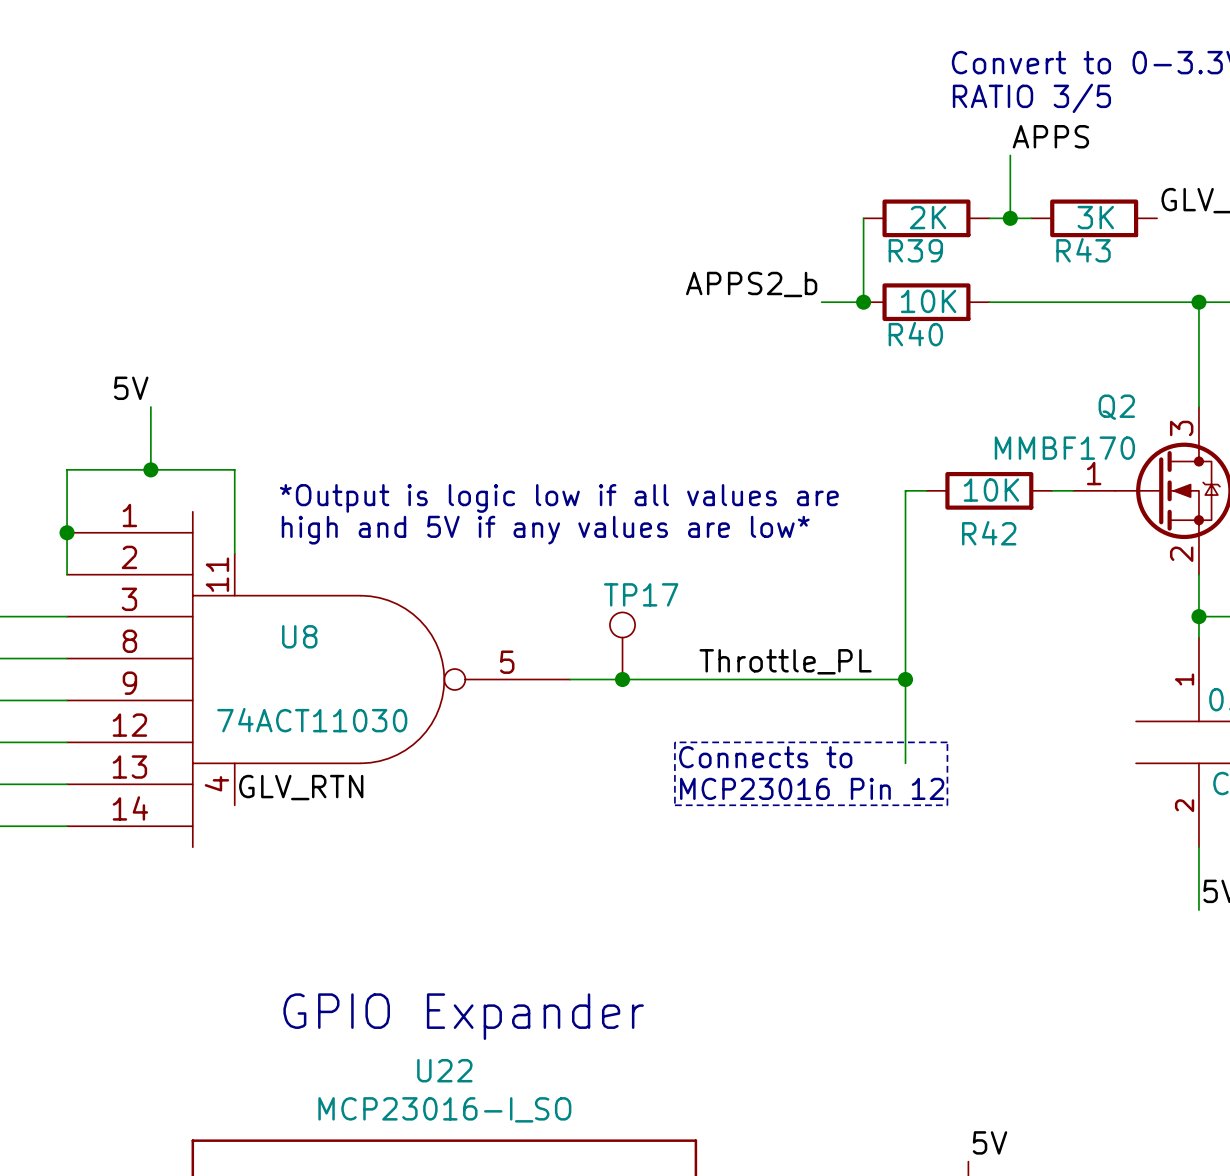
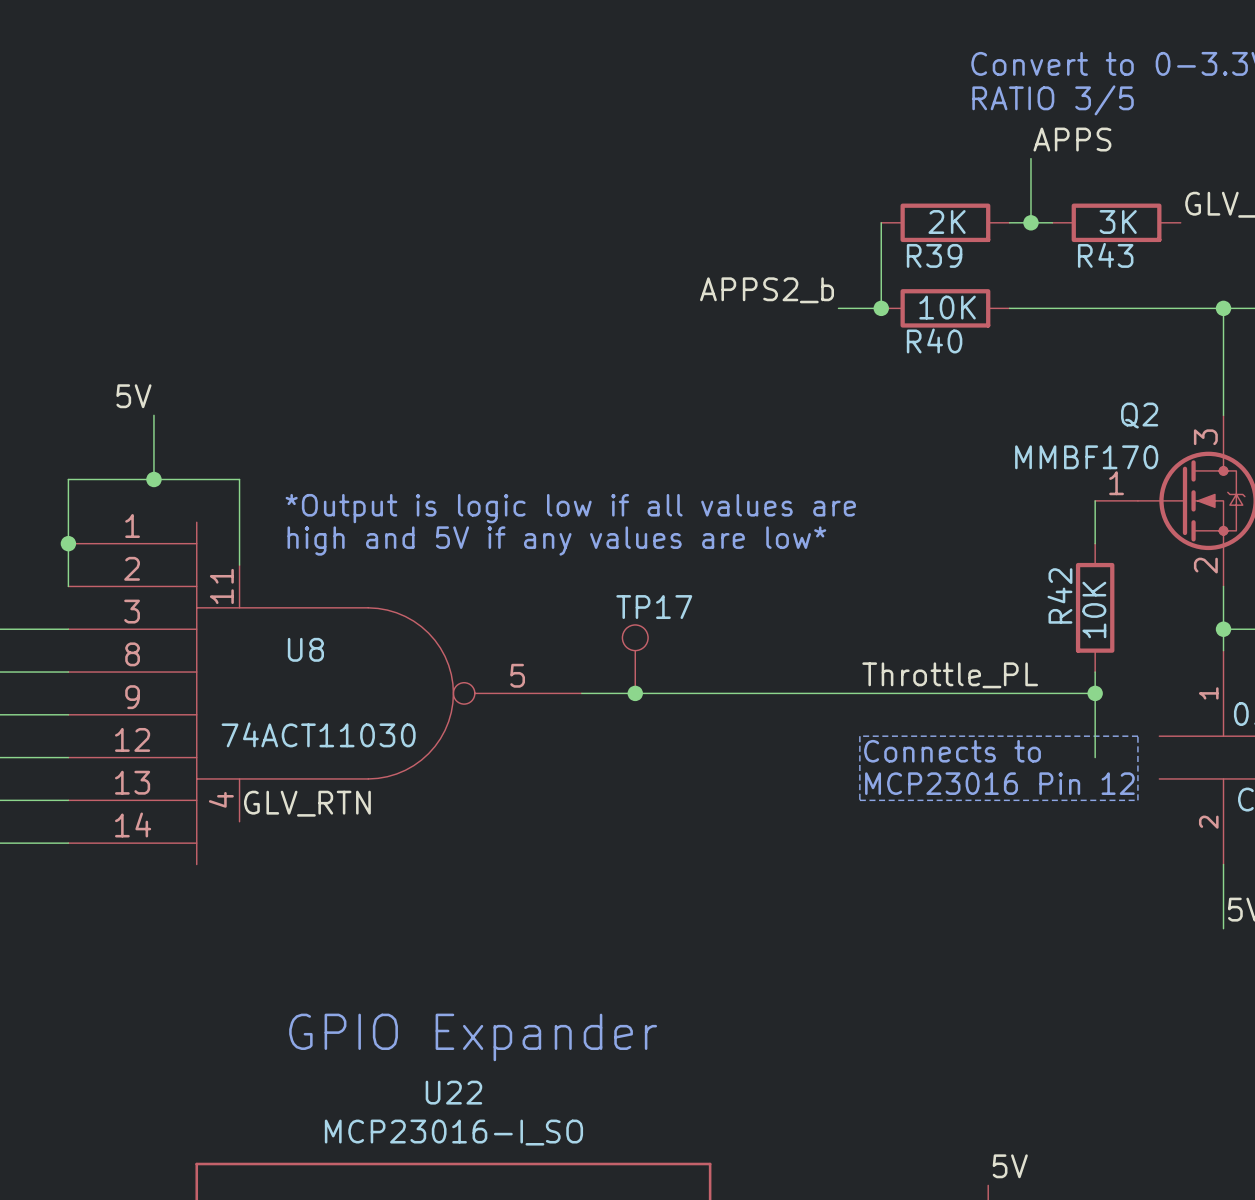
wire: (926, 490) (905, 490) (905, 763) -> none
R42 rotation: 0° (989, 490) -> 90° clockwise (1095, 607)
R42 position: (989, 490) -> (1095, 607)
wire: (1052, 490) (1073, 490) -> (1095, 543) (1095, 500)
wire: none -> (1095, 672) (1095, 757)
label position: Throttle_PL (785, 661) -> Throttle_PL (950, 675)
wire: none -> (924, 693) (1095, 693)
junction: (905, 679) -> none
junction: none -> (1095, 693)
line: (674, 742) (674, 805) (947, 805) (947, 742) (674, 742) -> (859, 736) (859, 800) (1137, 800) (1137, 736) (859, 736)
text position: Connects to (765, 757) -> Connects to (952, 751)
text position: MCP23016 Pin 12 (812, 788) -> MCP23016 Pin 12 (999, 783)

